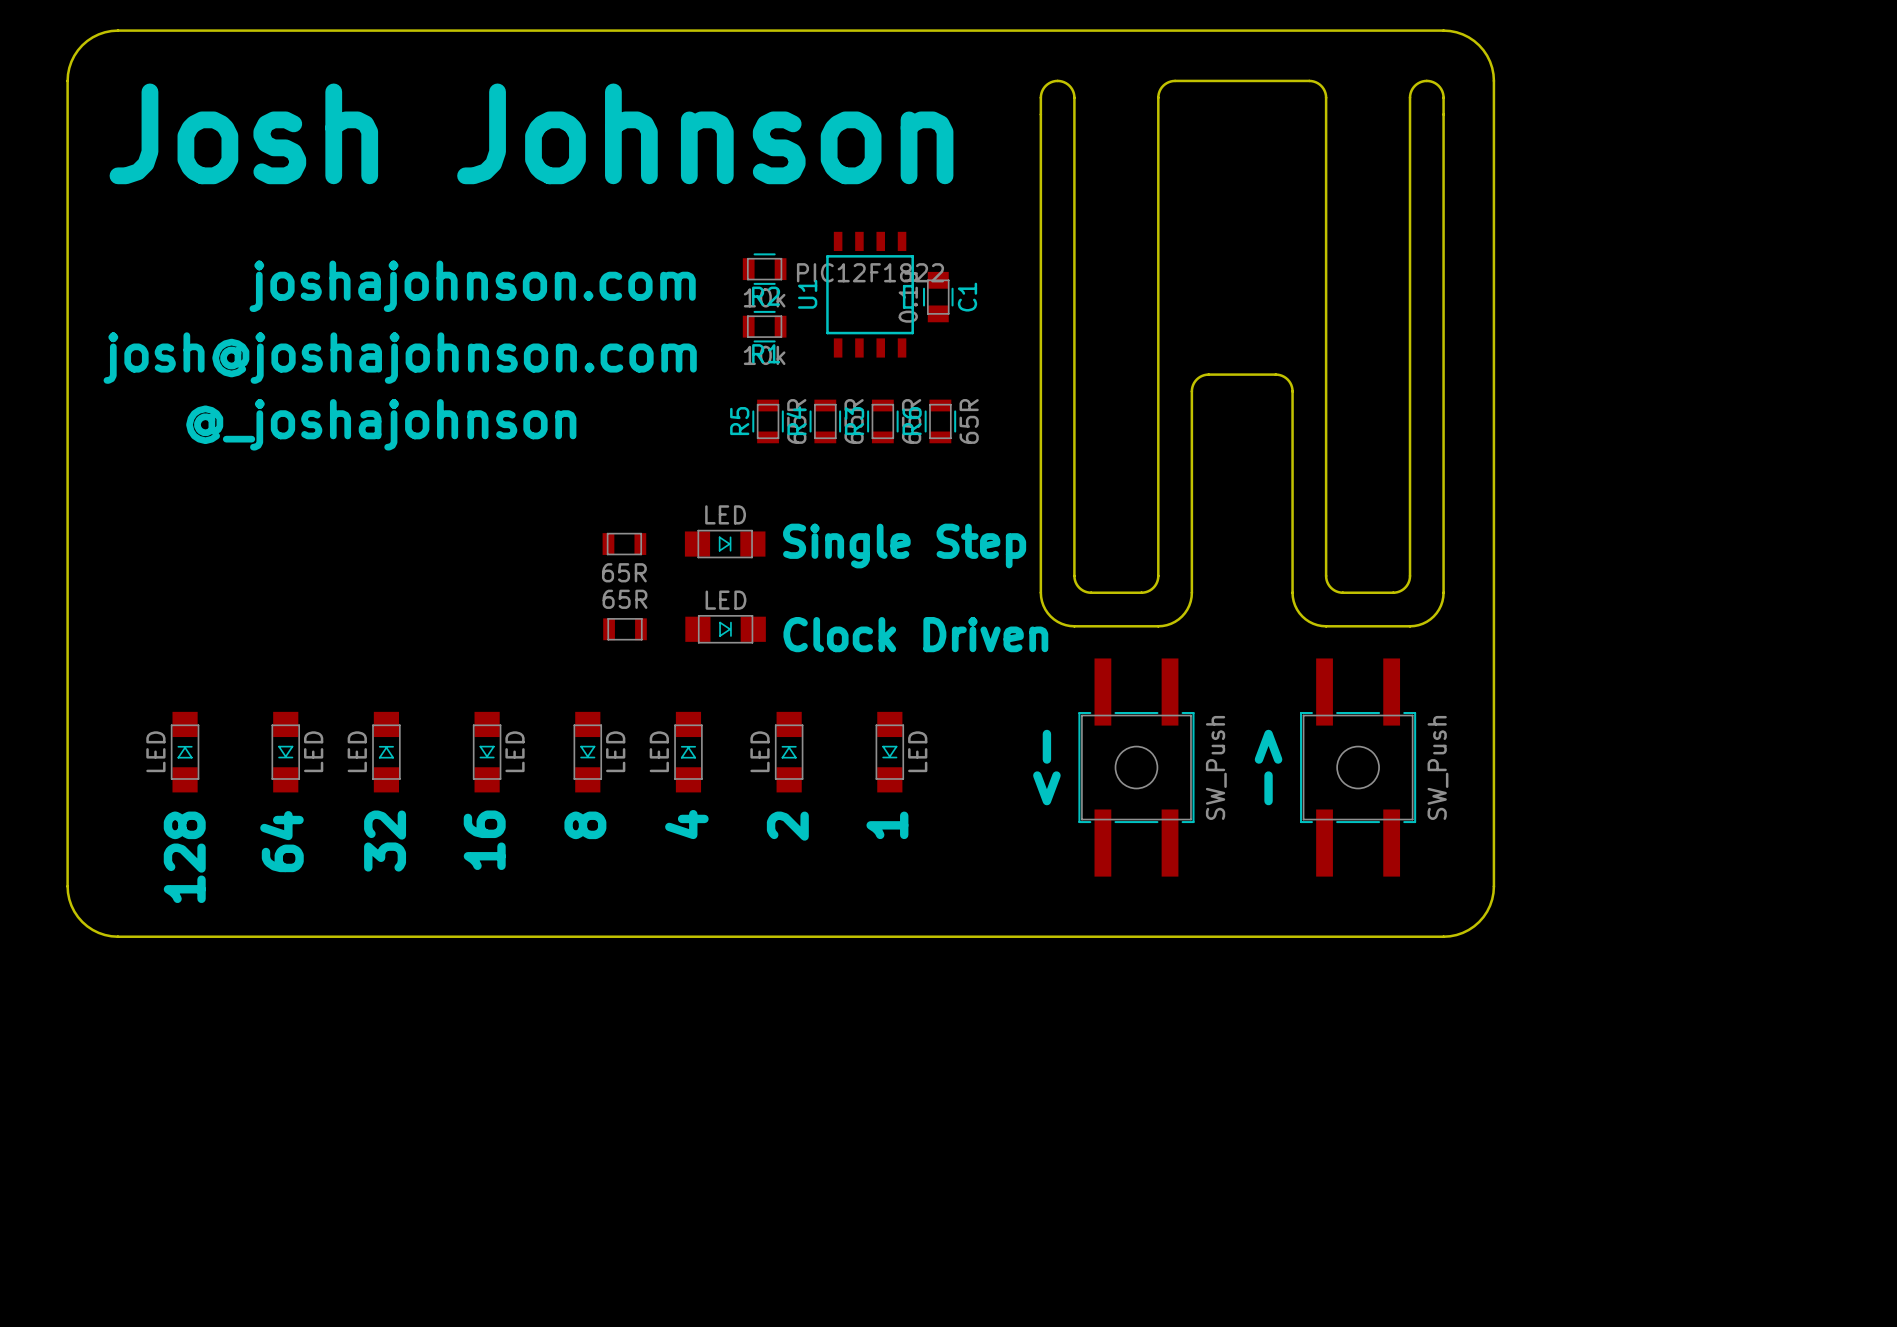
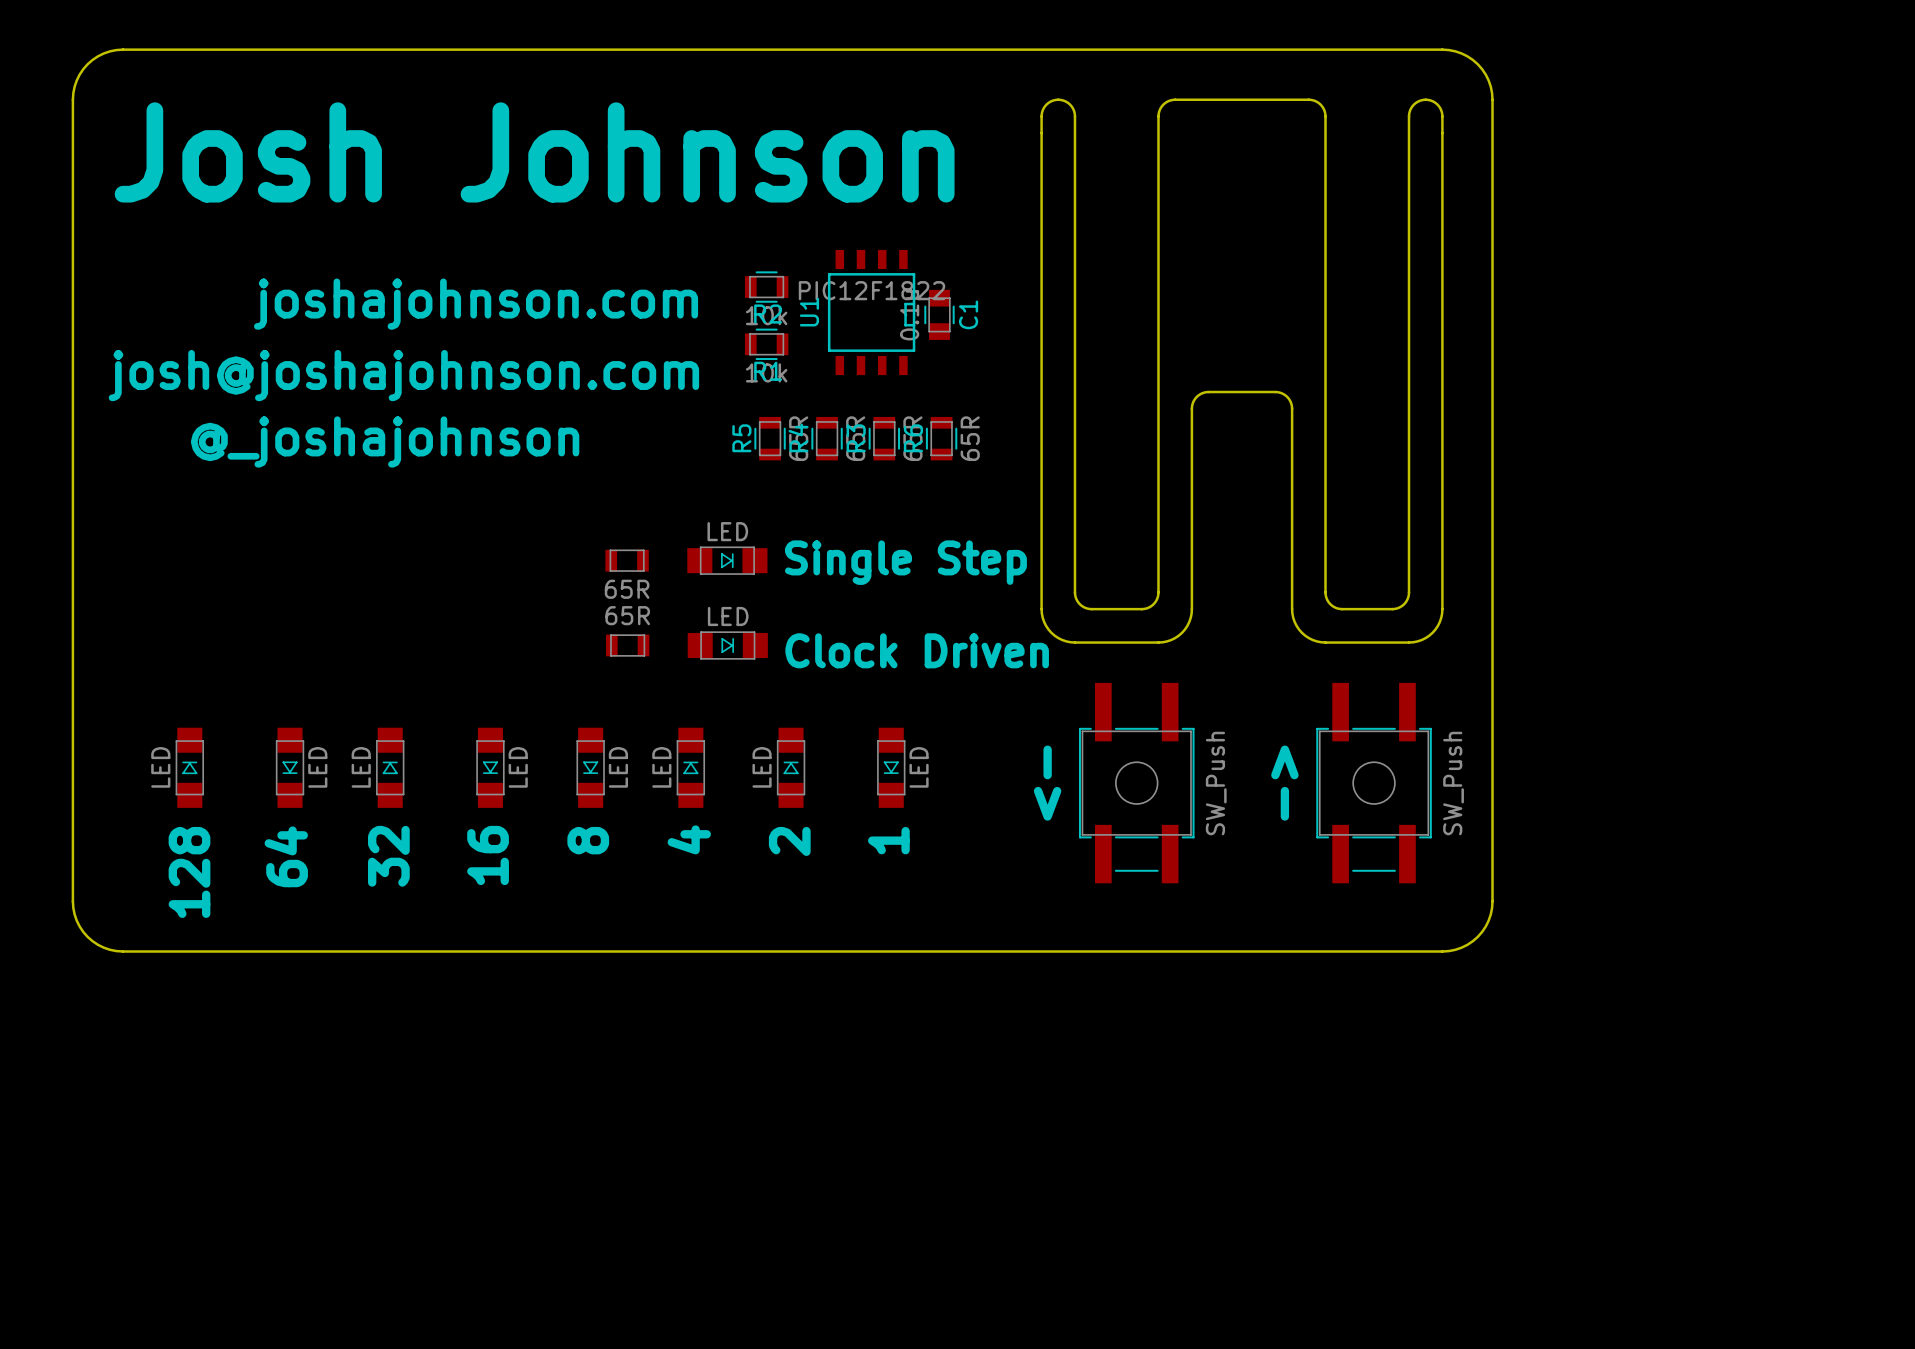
part footprint: [1078, 658, 1195, 877] -> [1078, 682, 1195, 884]
part footprint: [1300, 658, 1417, 877] -> [1316, 682, 1432, 884]

